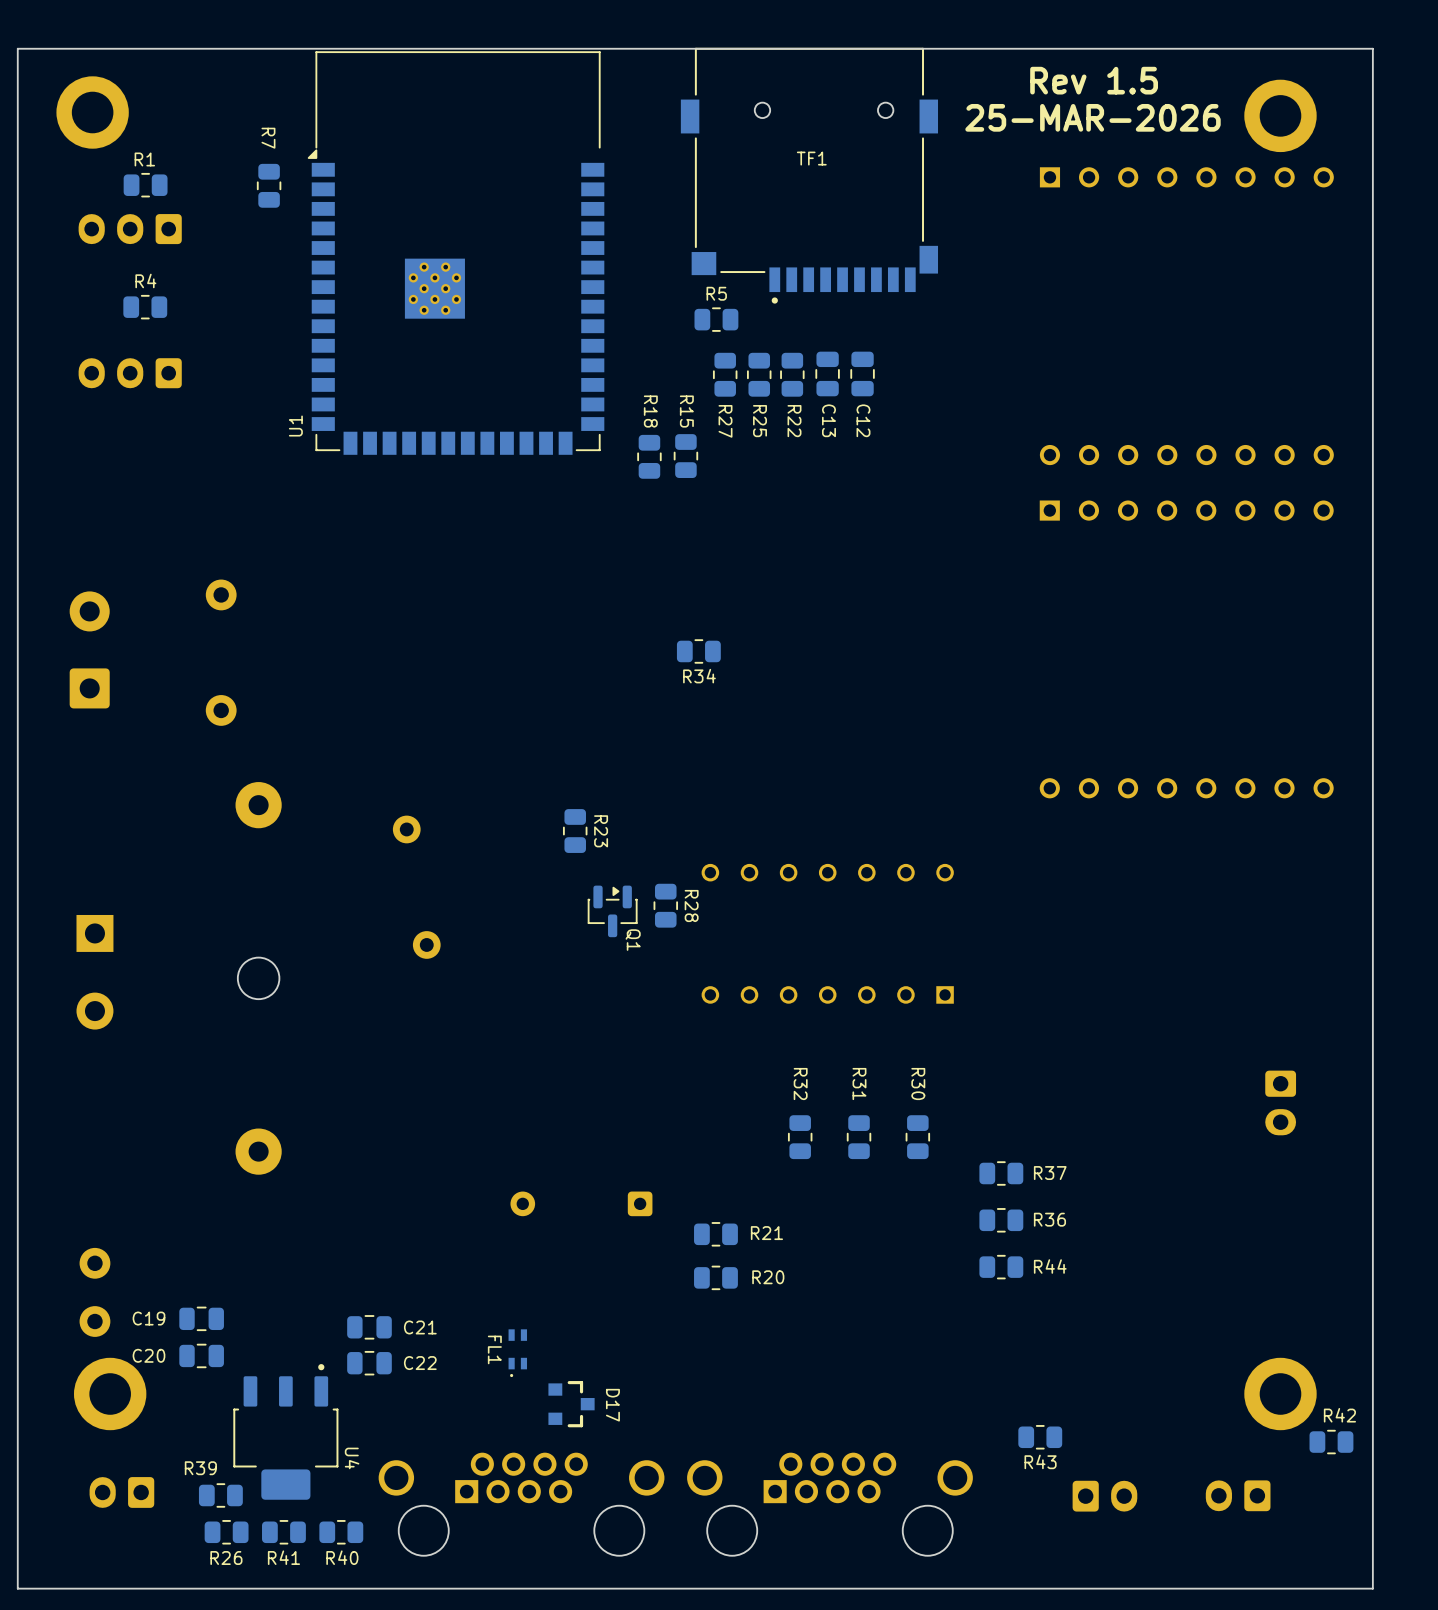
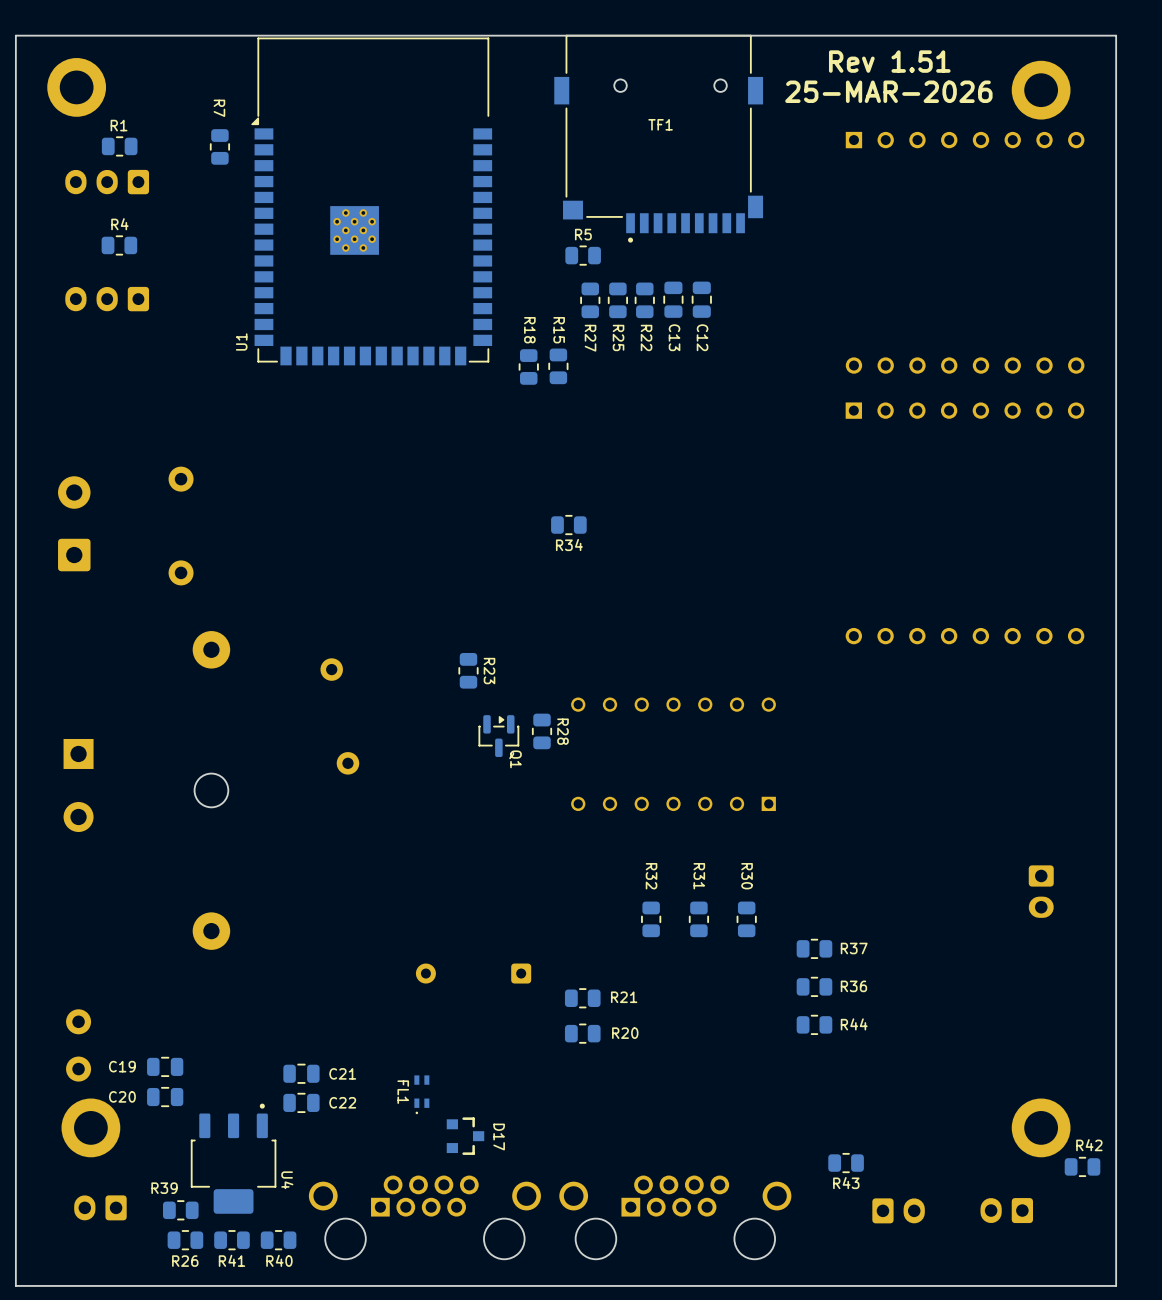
text: Rev 1.5 (1094, 80) -> Rev 1.51 (889, 61)

